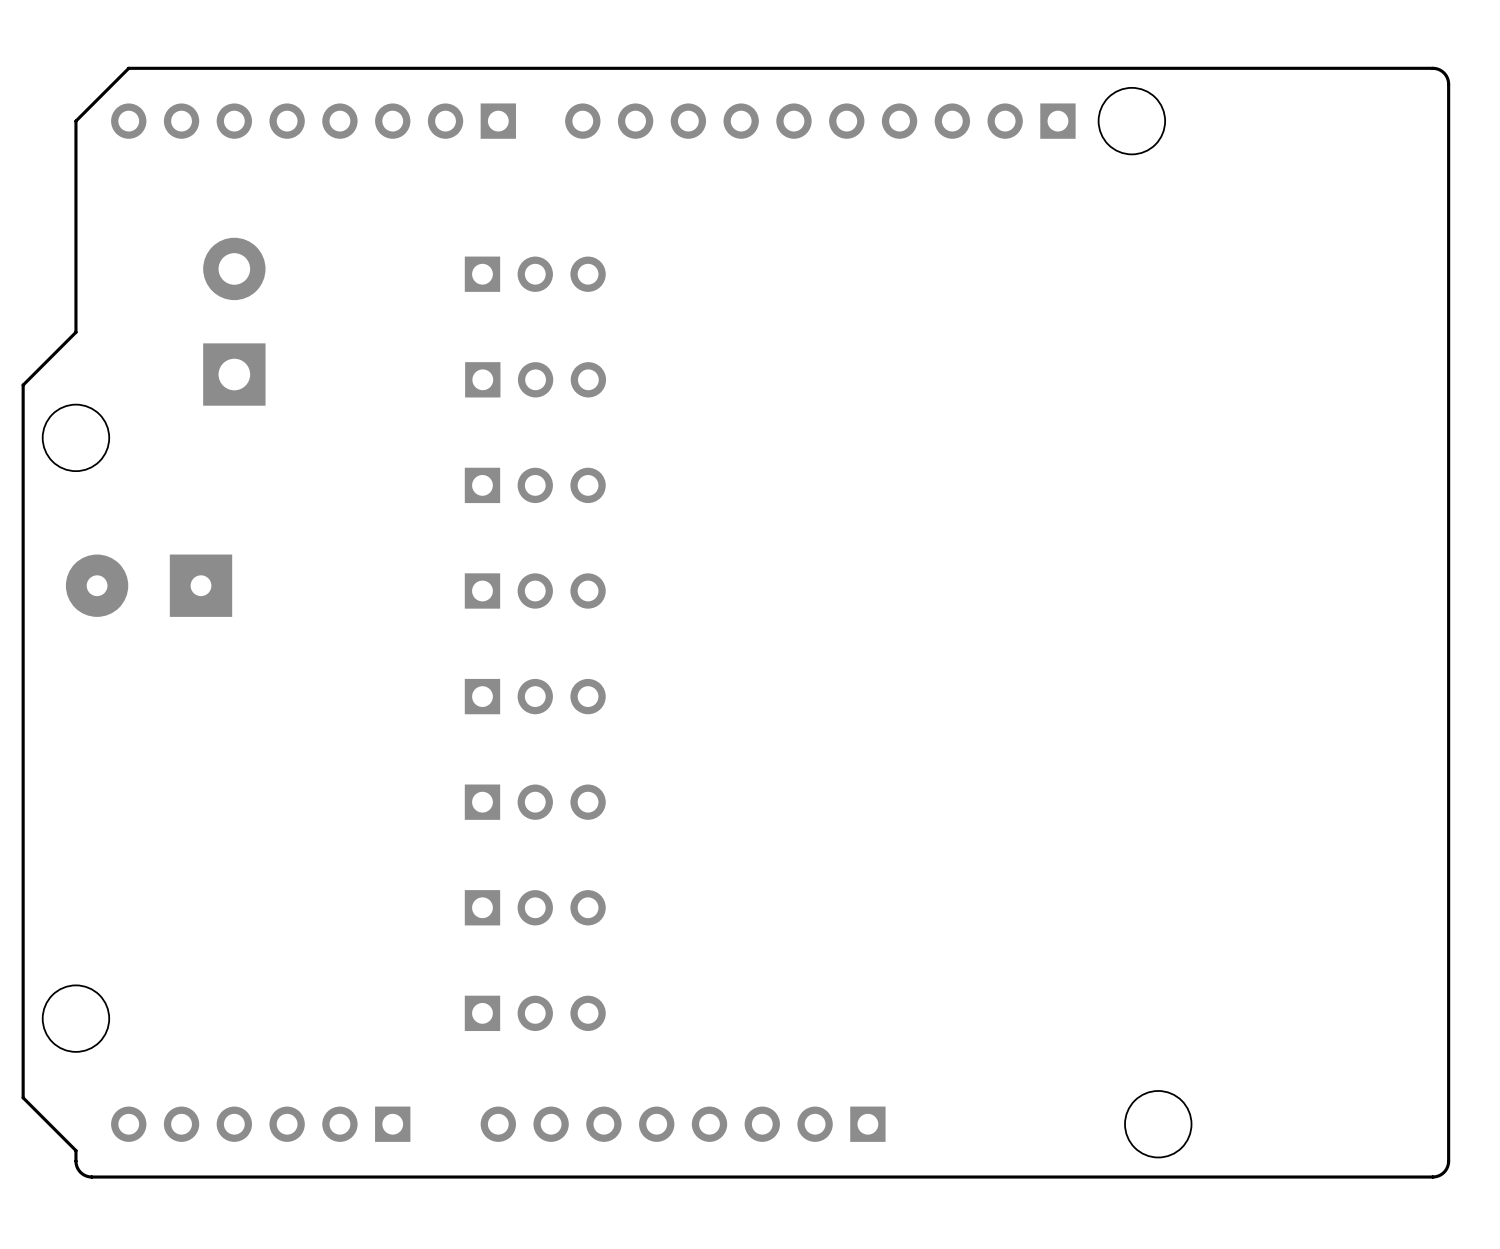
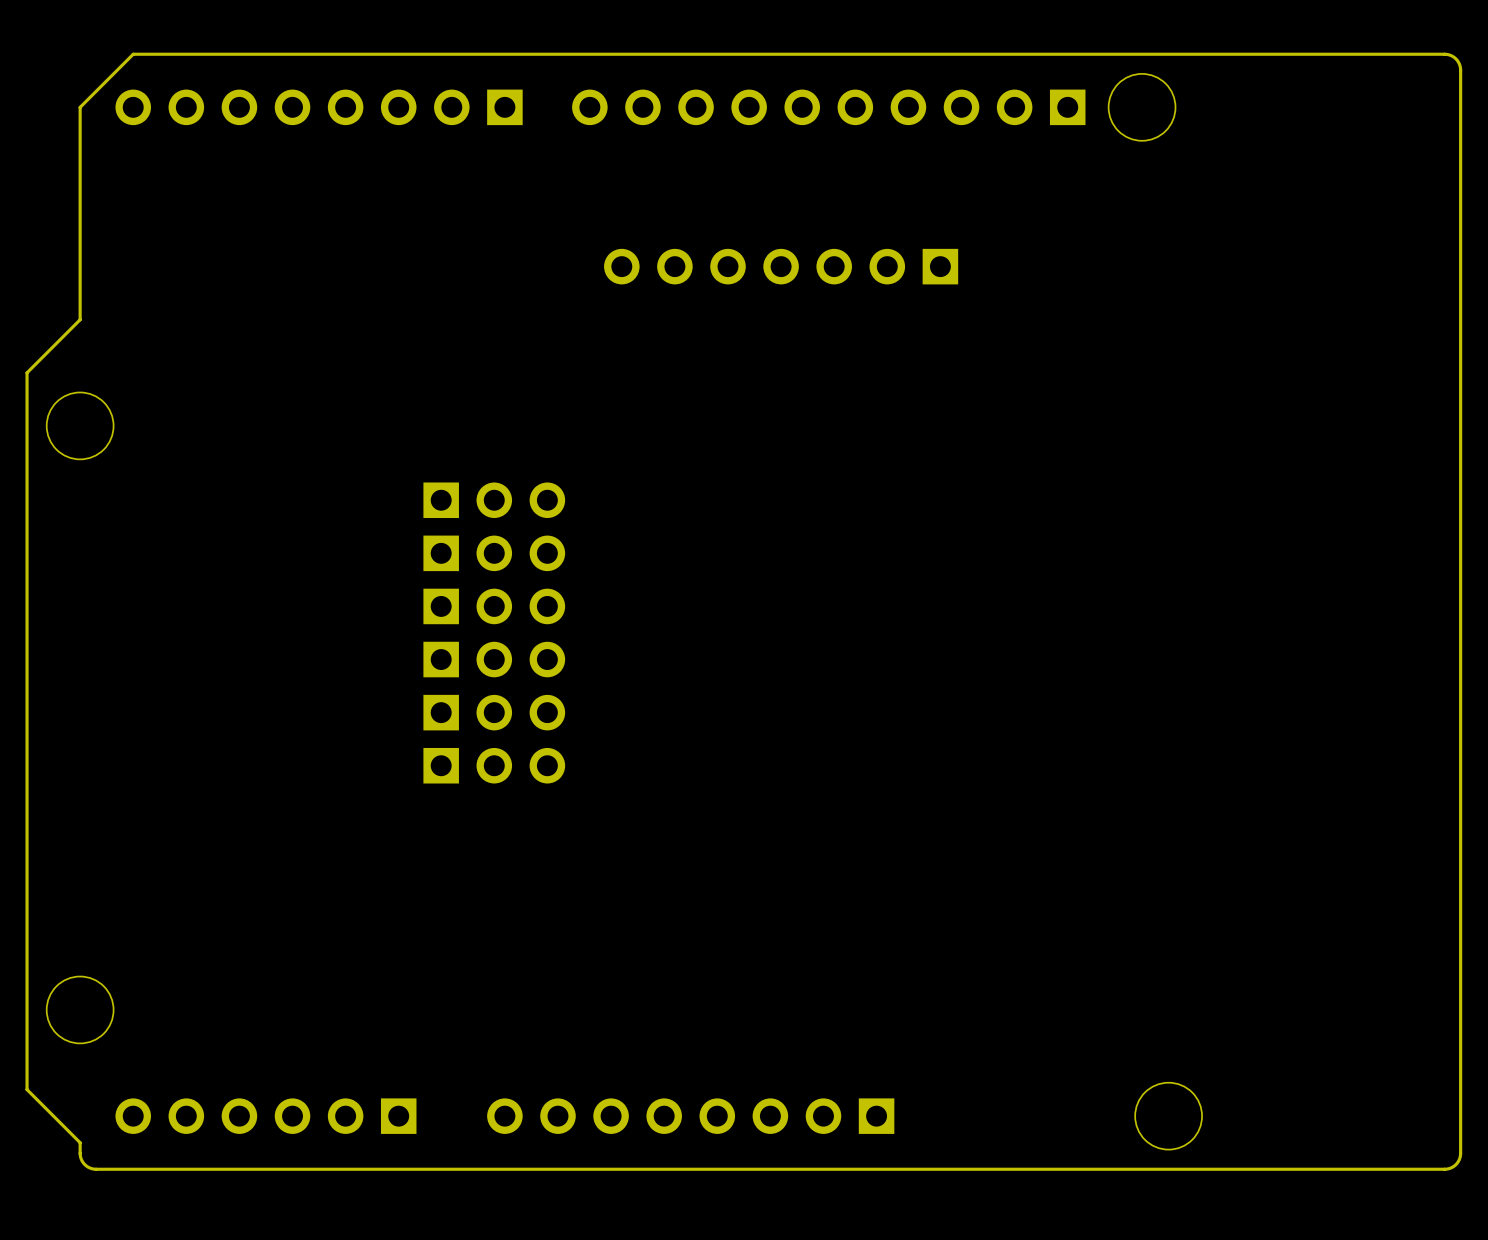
part: (535, 274) -> none
part: none -> (781, 266)
part: (234, 321) -> none
part: (535, 379) -> none
part: (535, 485) -> none
part: none -> (494, 500)
part: none -> (494, 553)
part: (149, 585) -> none
part: (535, 590) -> none
part: none -> (494, 606)
part: none -> (494, 659)
part: (535, 696) -> none
part: none -> (494, 712)
part: none -> (494, 765)
part: (535, 802) -> none
part: (535, 907) -> none
part: (535, 1013) -> none

